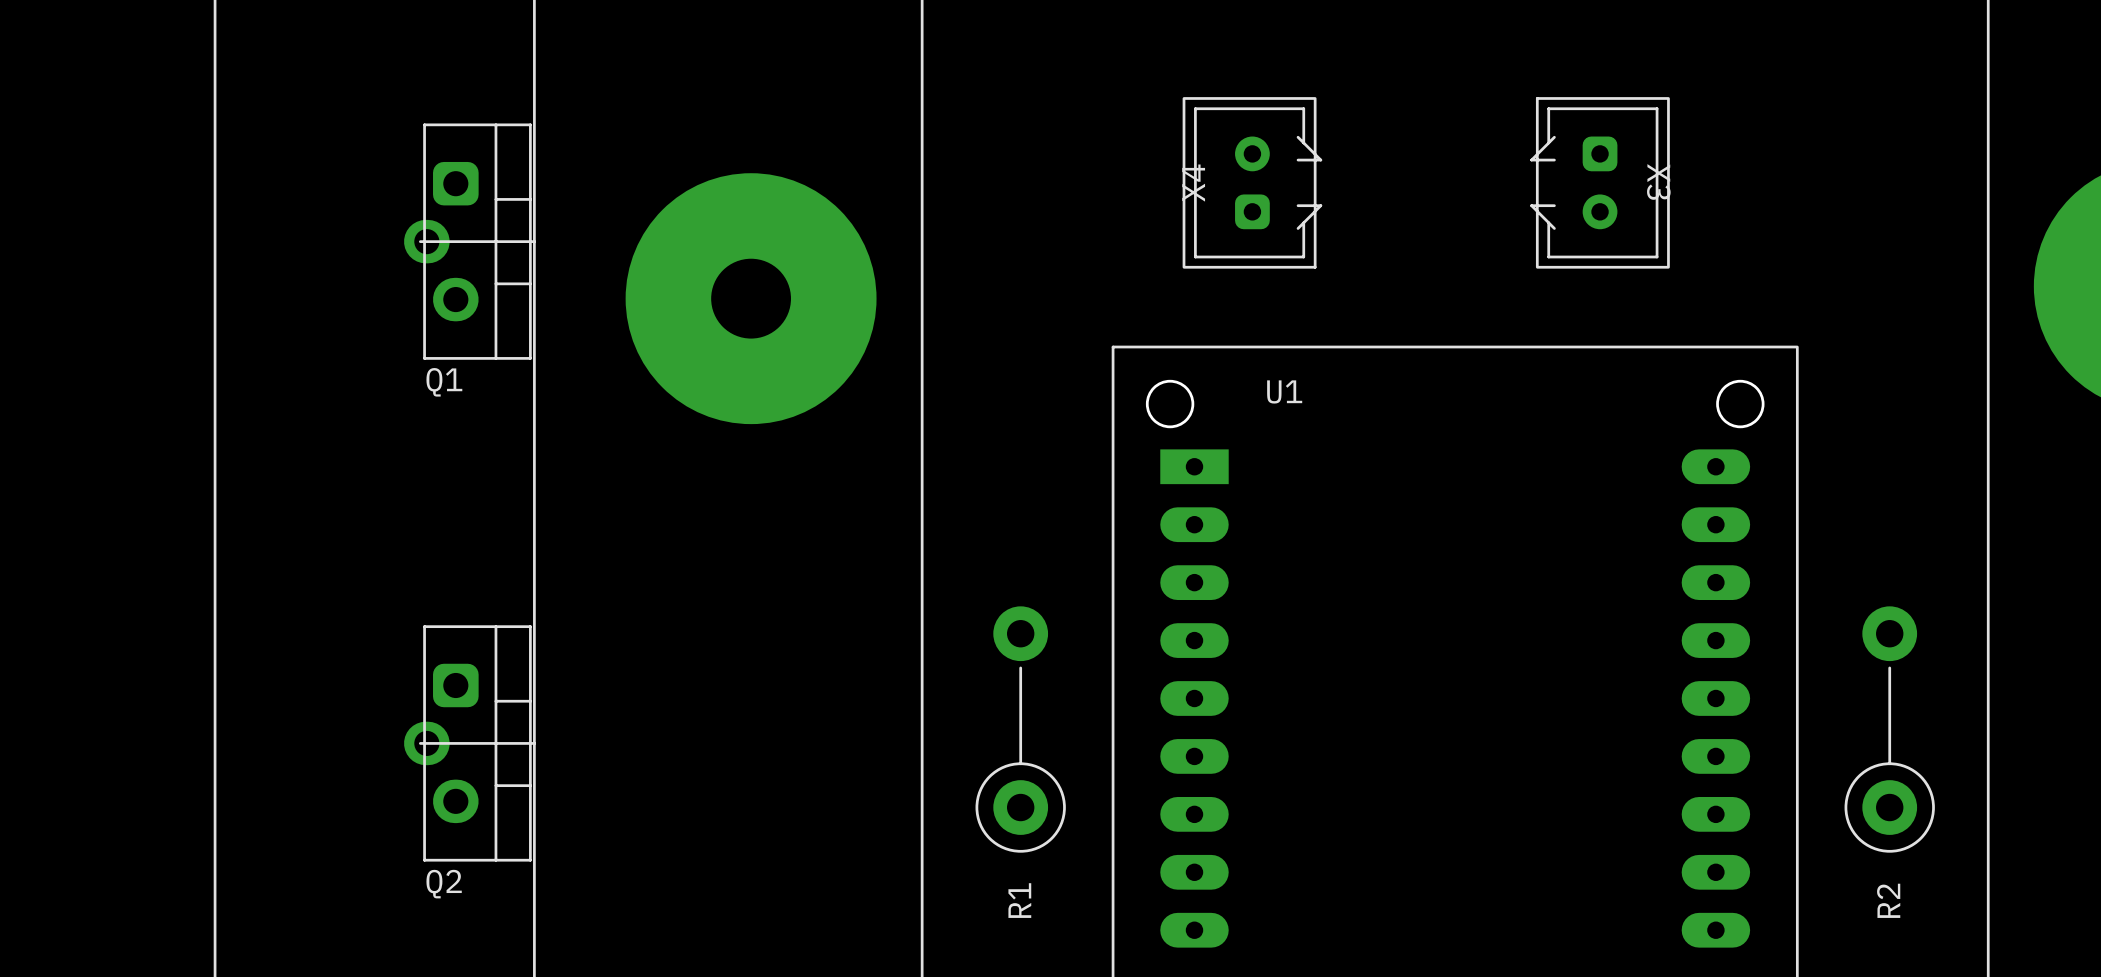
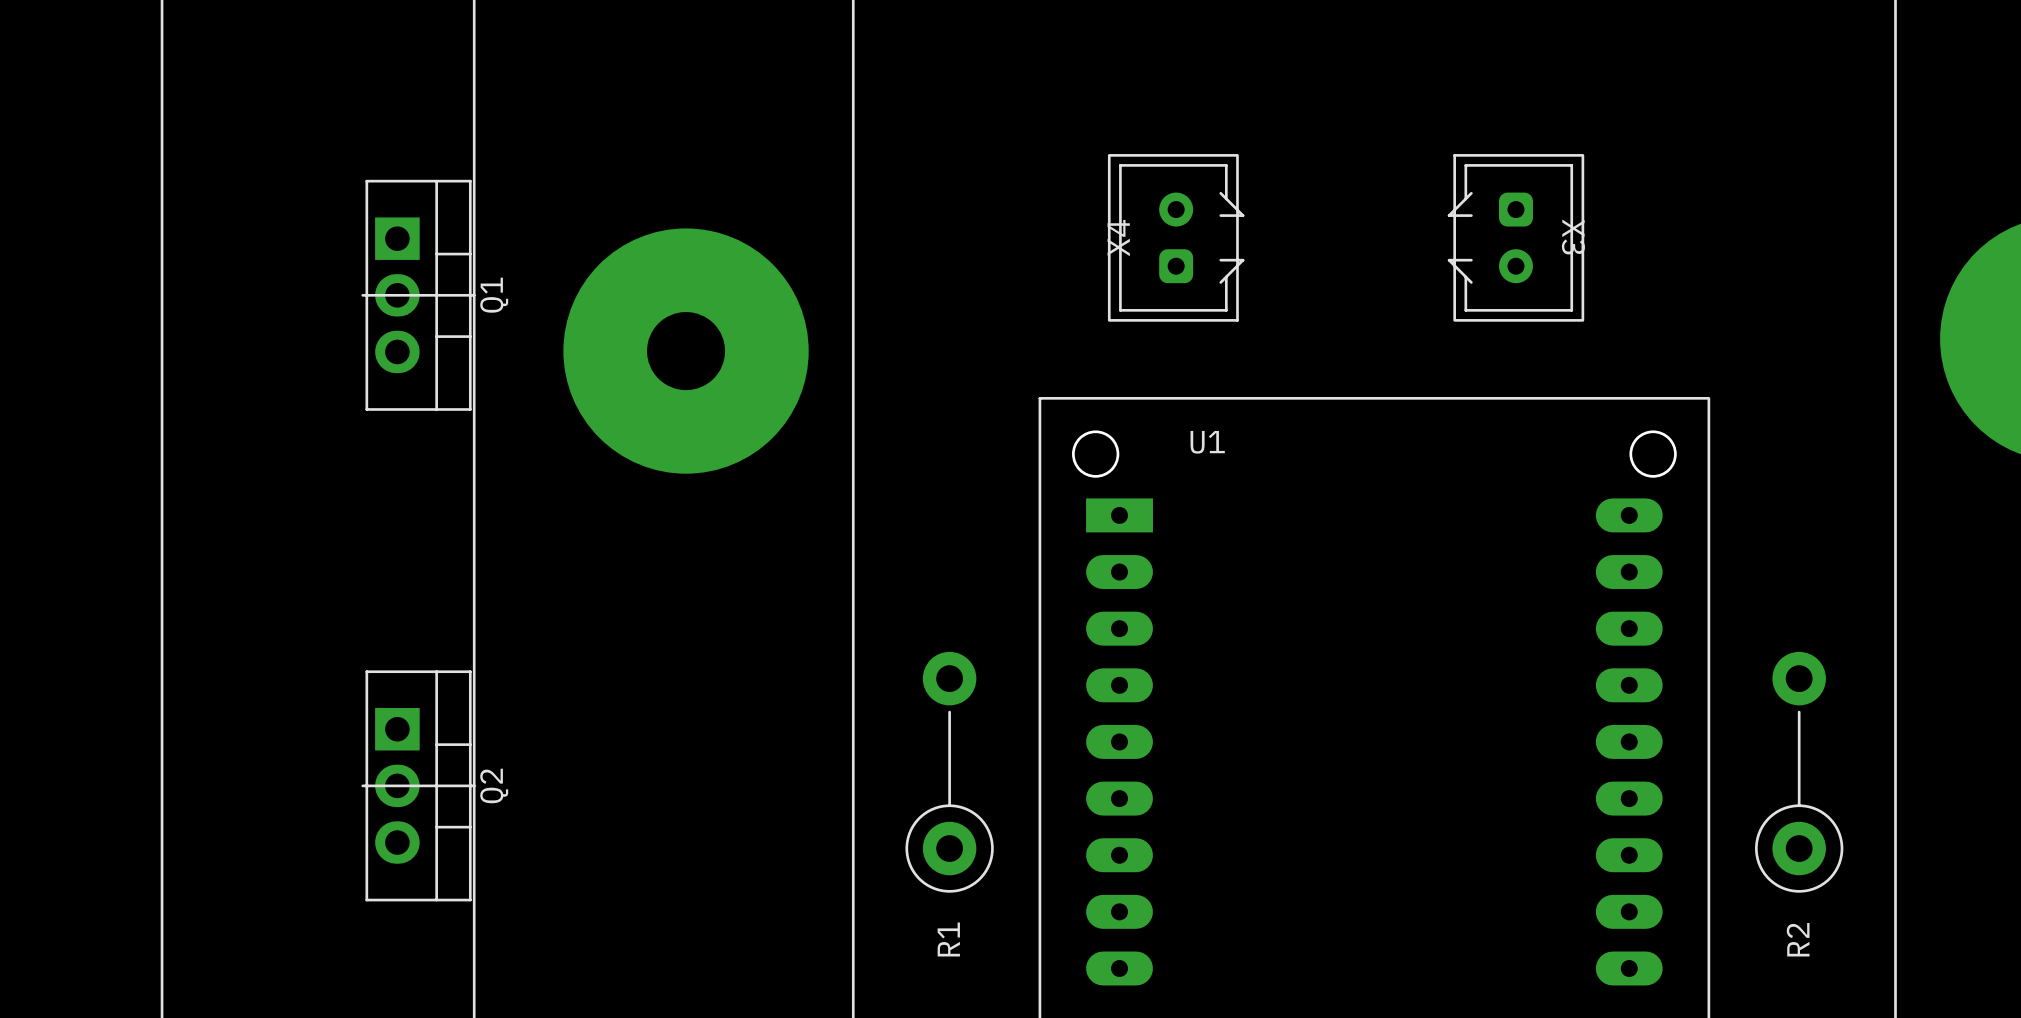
Q1 footprint: [404, 123, 532, 360] -> [365, 179, 472, 411]
Q1 name position: Q1 (444, 382) -> Q1 (494, 295)
Q2 footprint: [404, 625, 532, 862] -> [365, 670, 472, 902]
Q2 name position: Q2 (444, 884) -> Q2 (494, 785)

